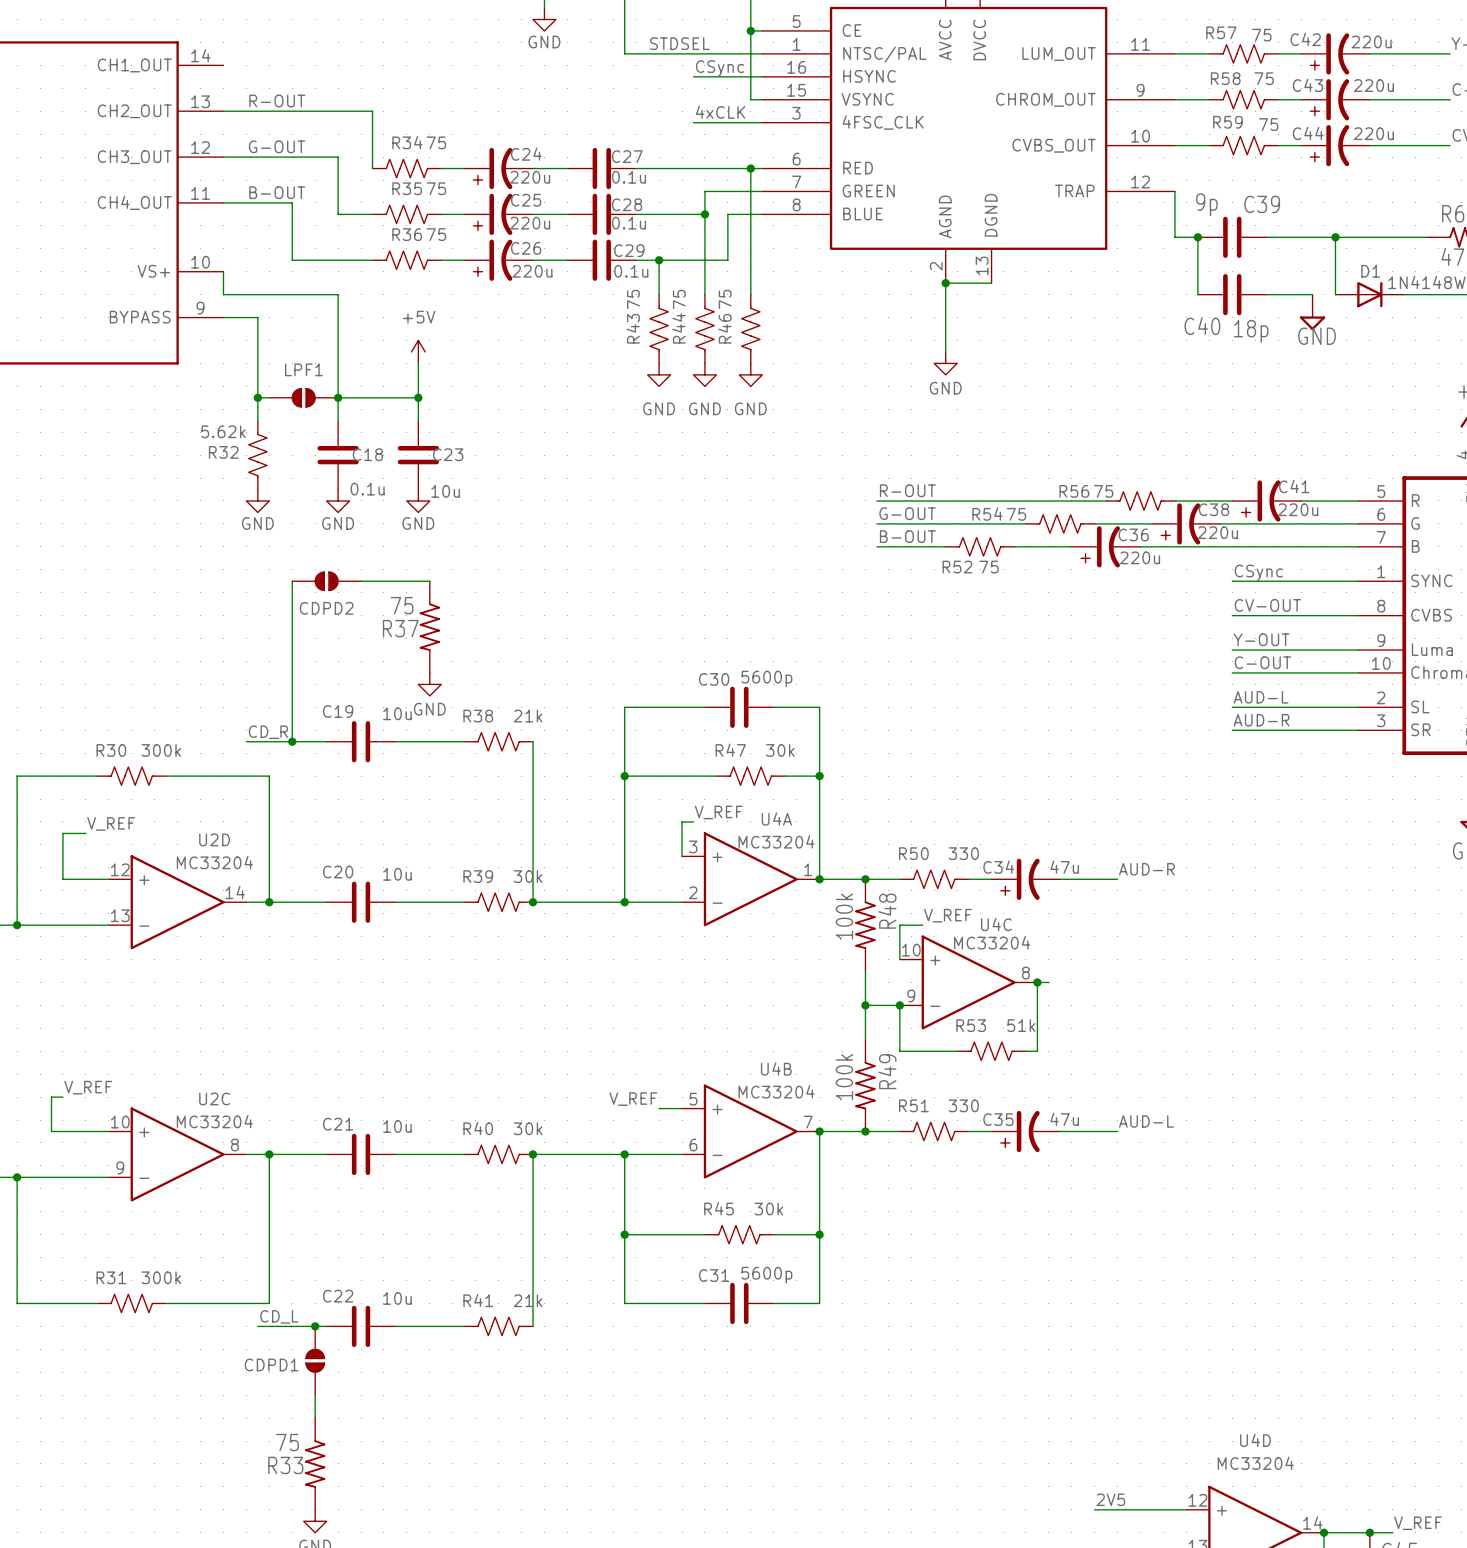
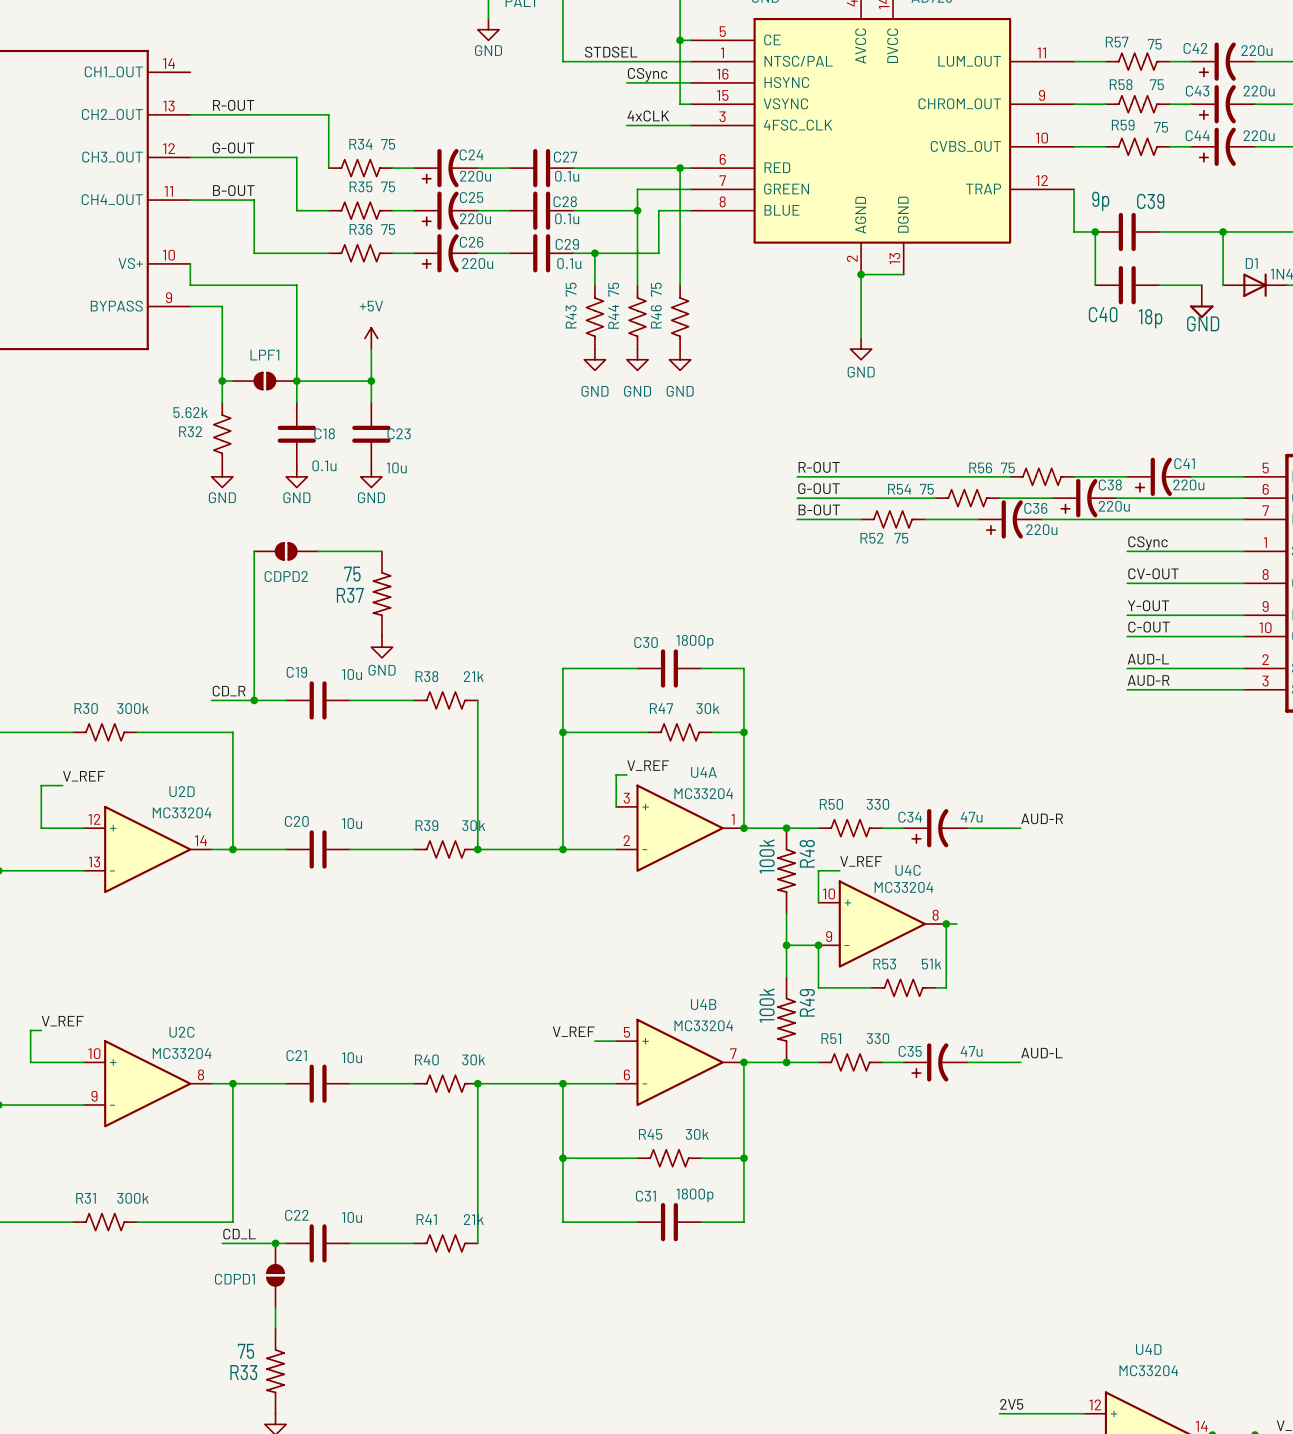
C30 value: 5600p (766, 679) -> 1800p (694, 641)
C31 value: 5600p (766, 1275) -> 1800p (694, 1195)

